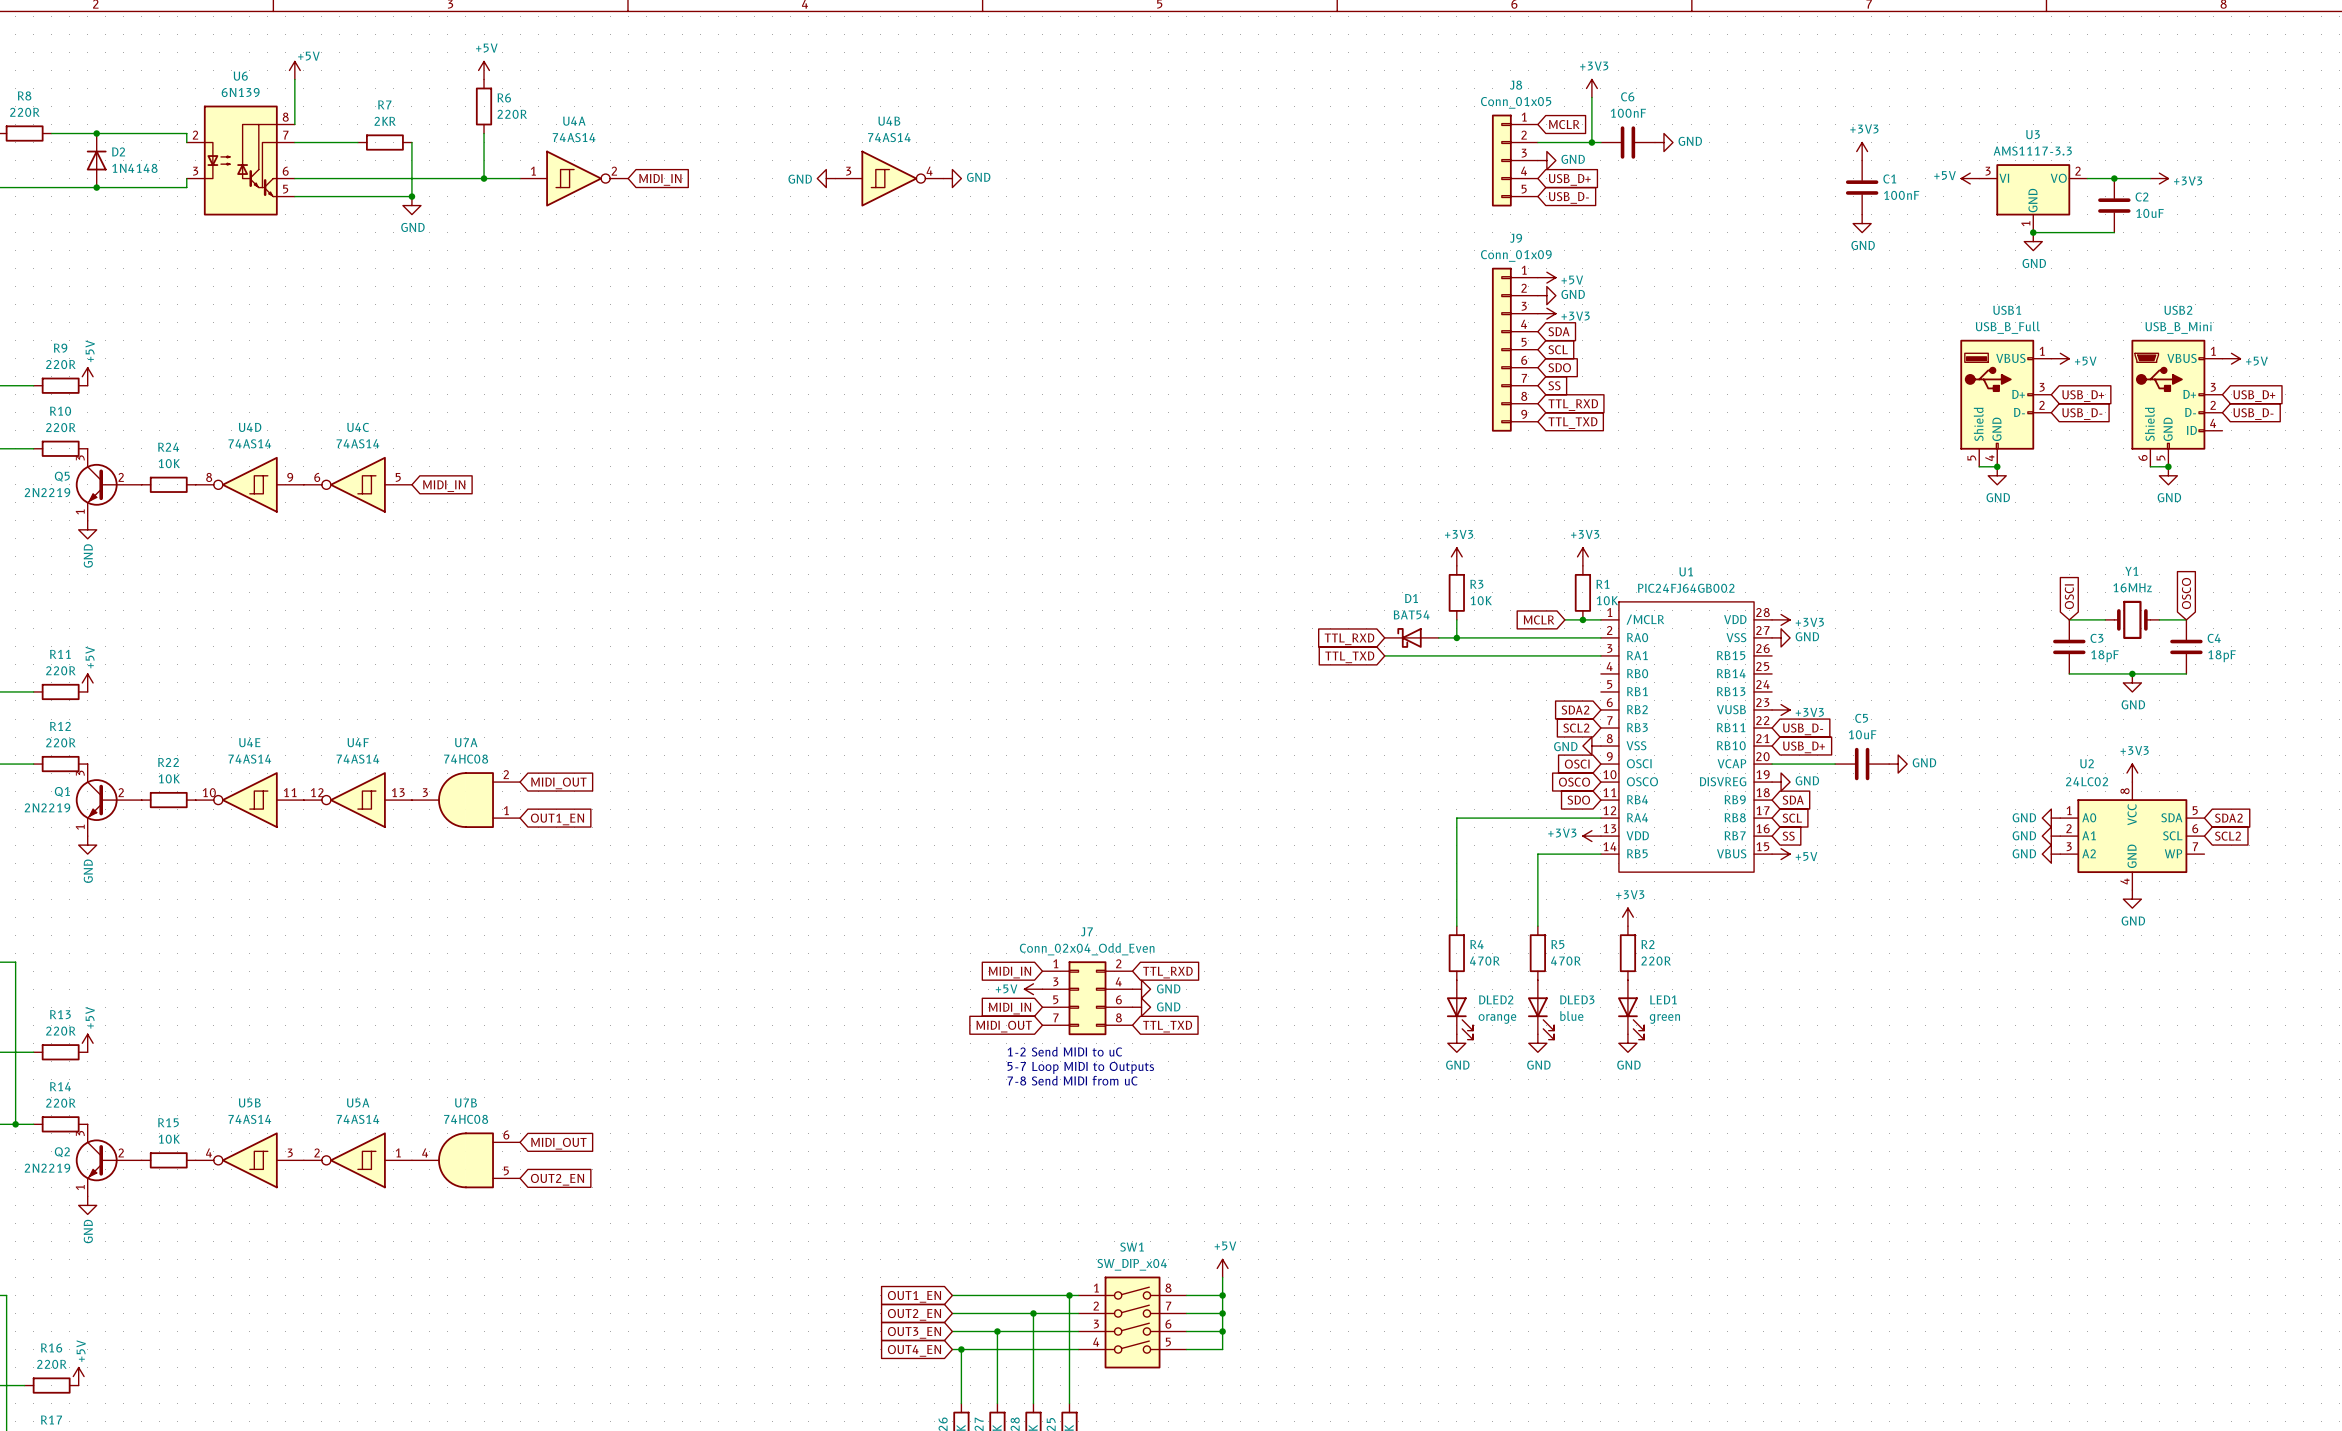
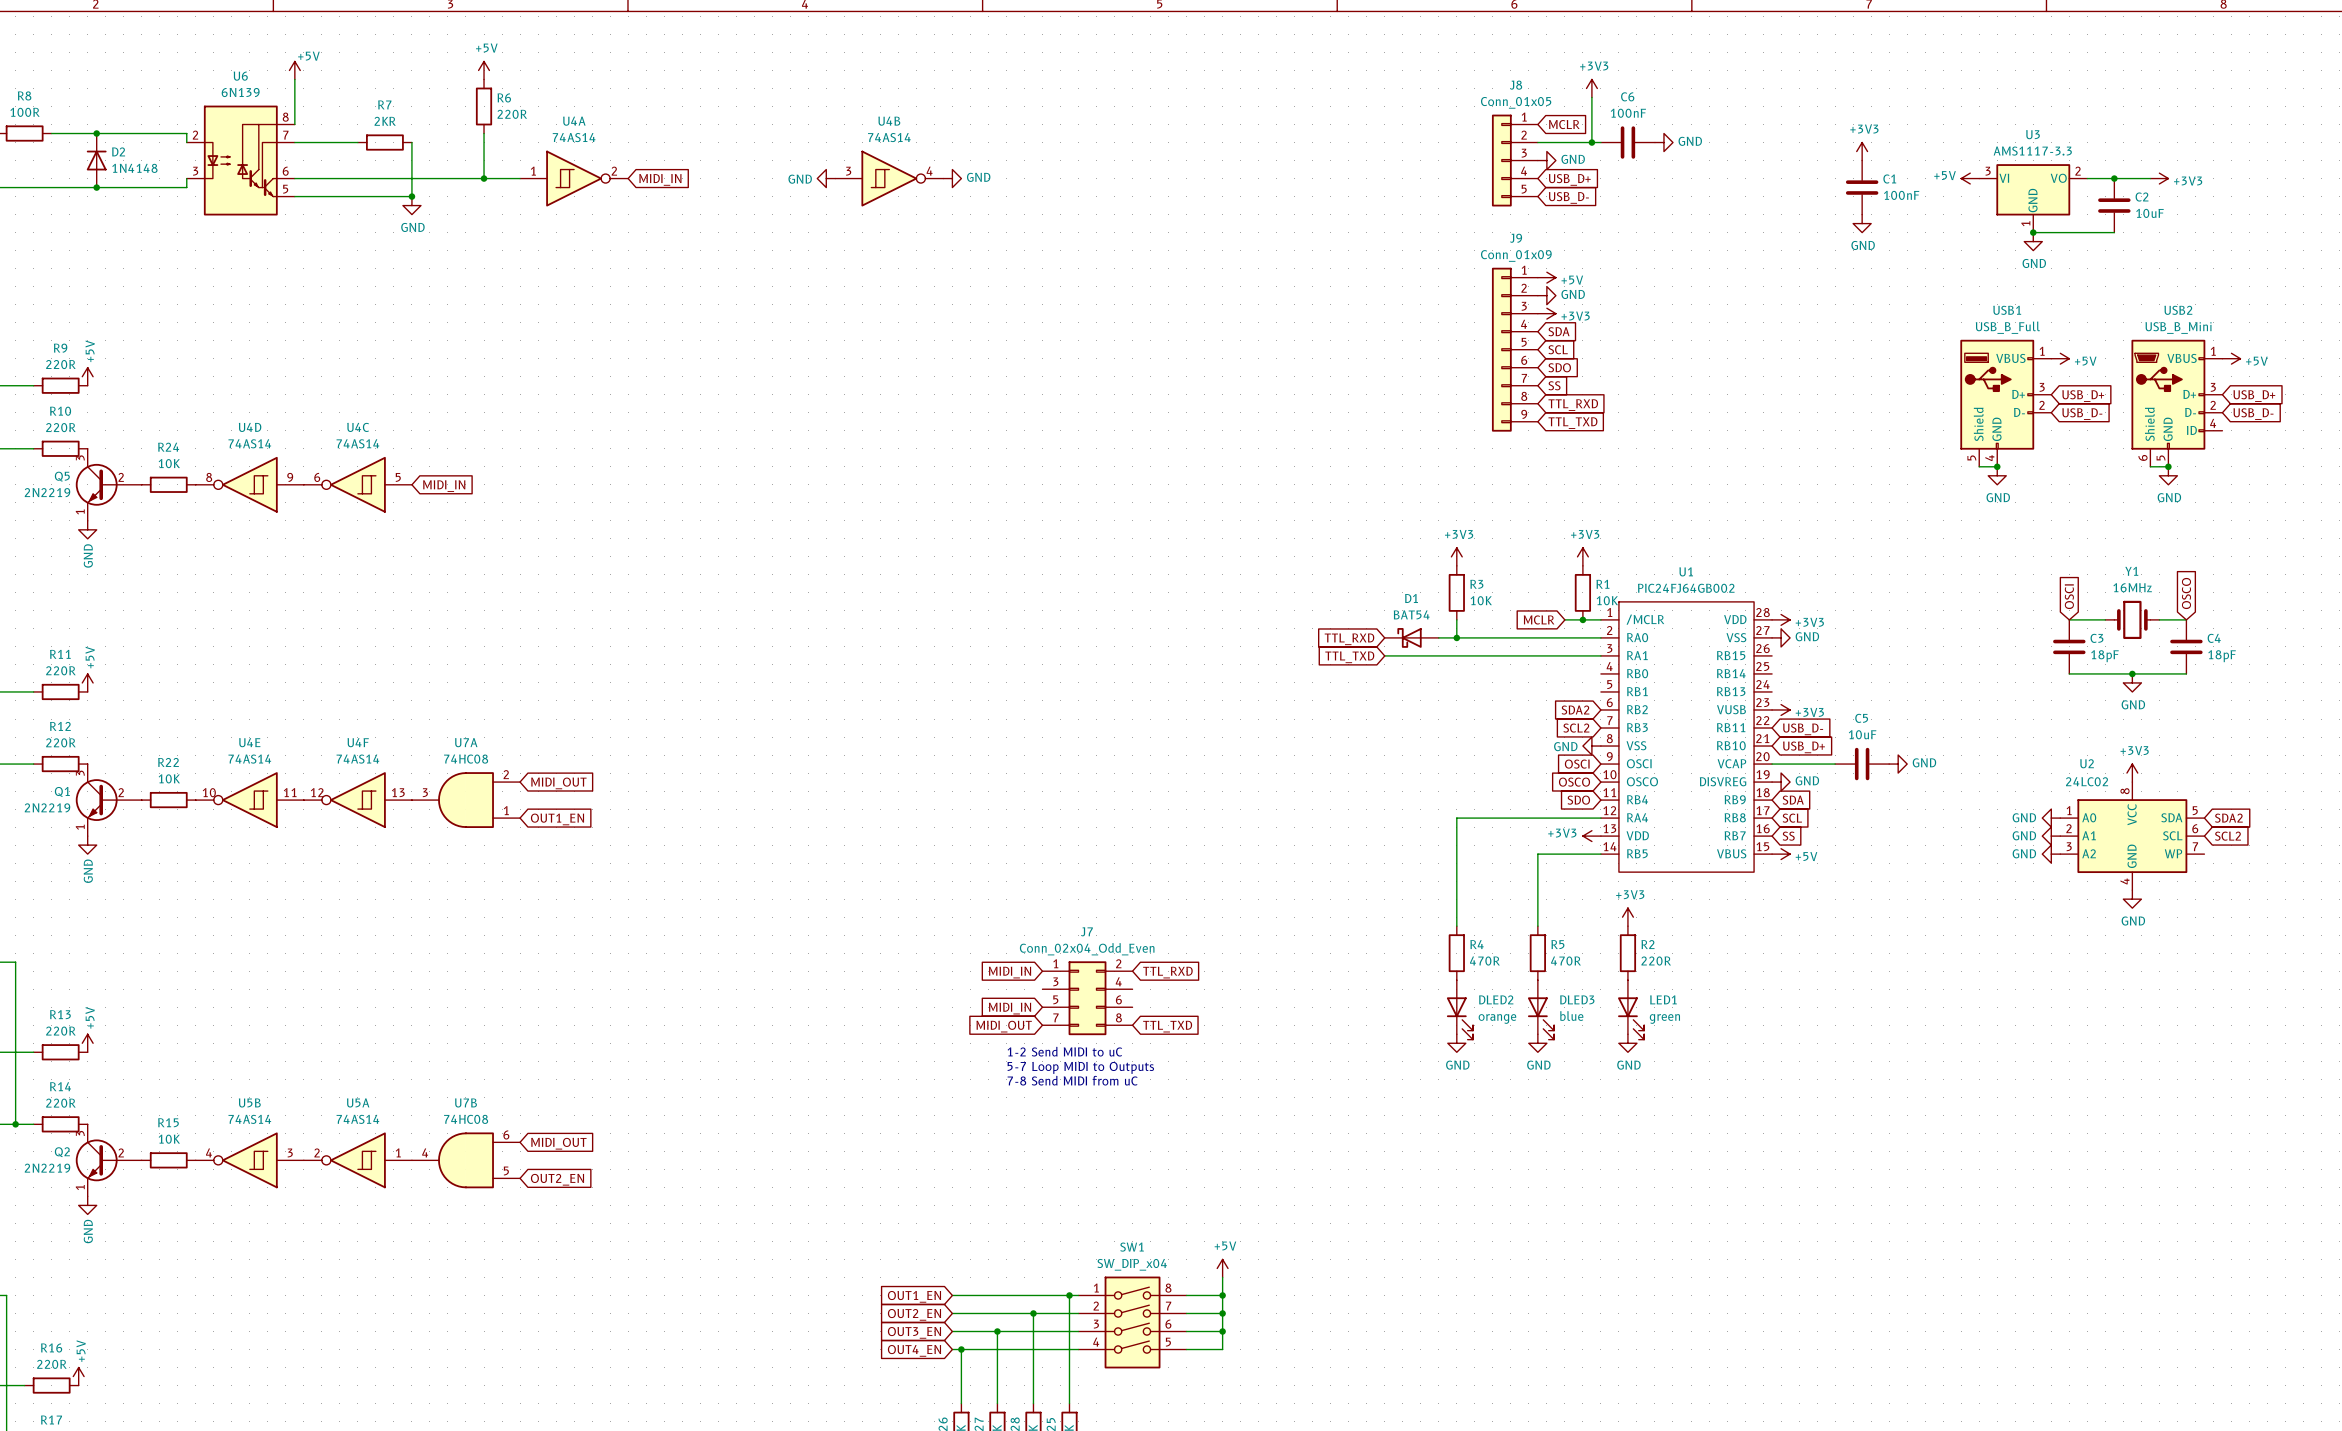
R8 value: 220R (24, 112) -> 100R (25, 112)
power symbol: +5V (1033, 989) -> none
power symbol: GND (1141, 989) -> none
power symbol: GND (1141, 1007) -> none

